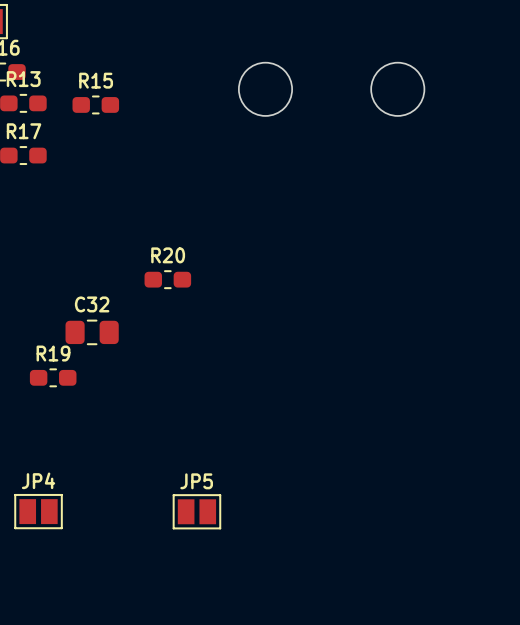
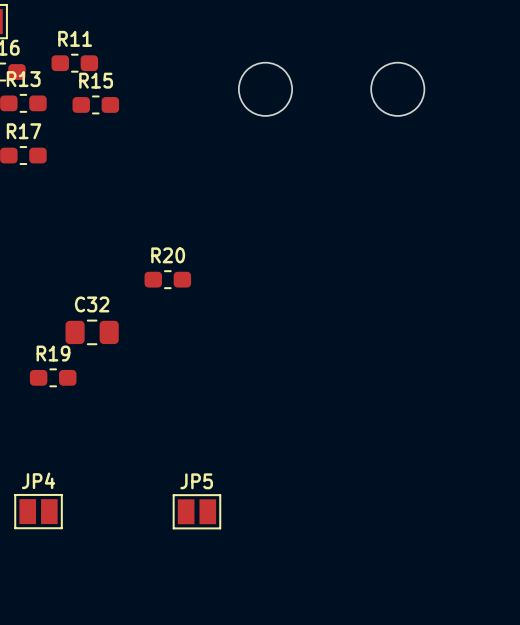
R11: none -> (74, 63)

